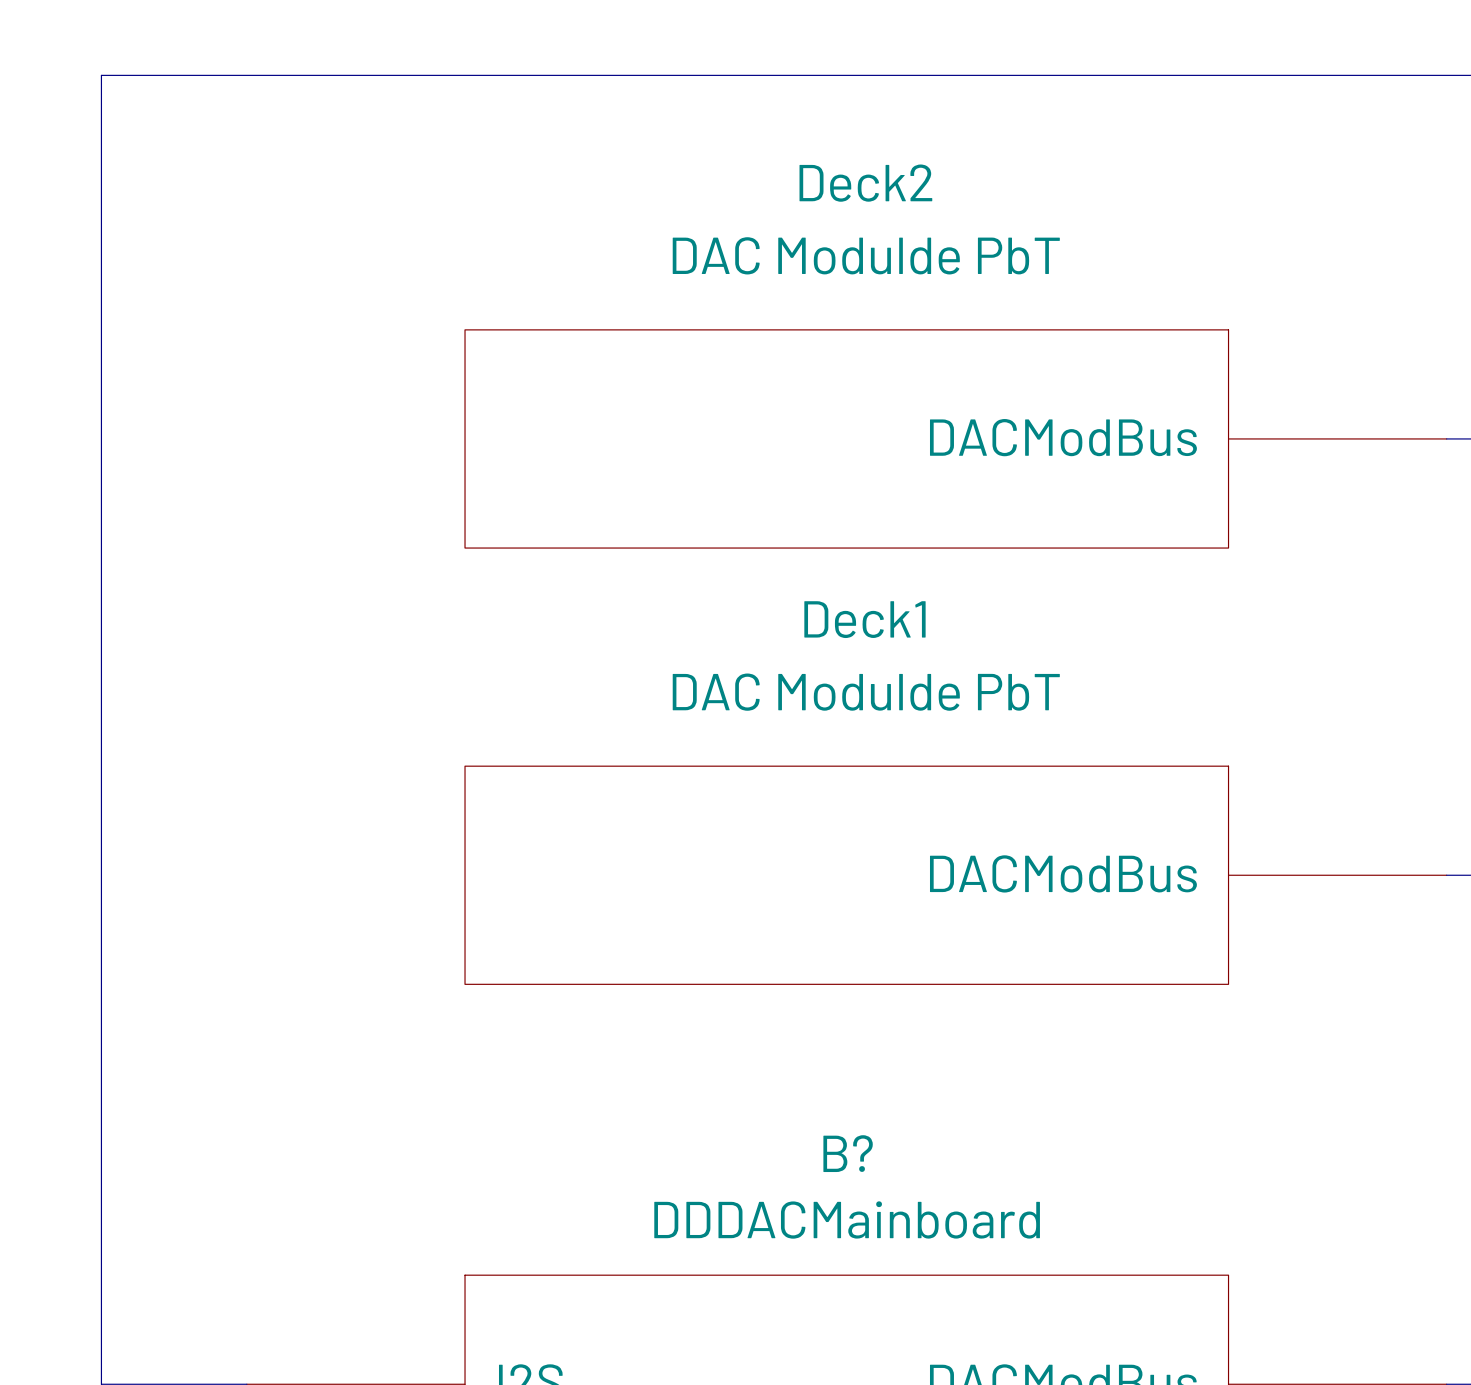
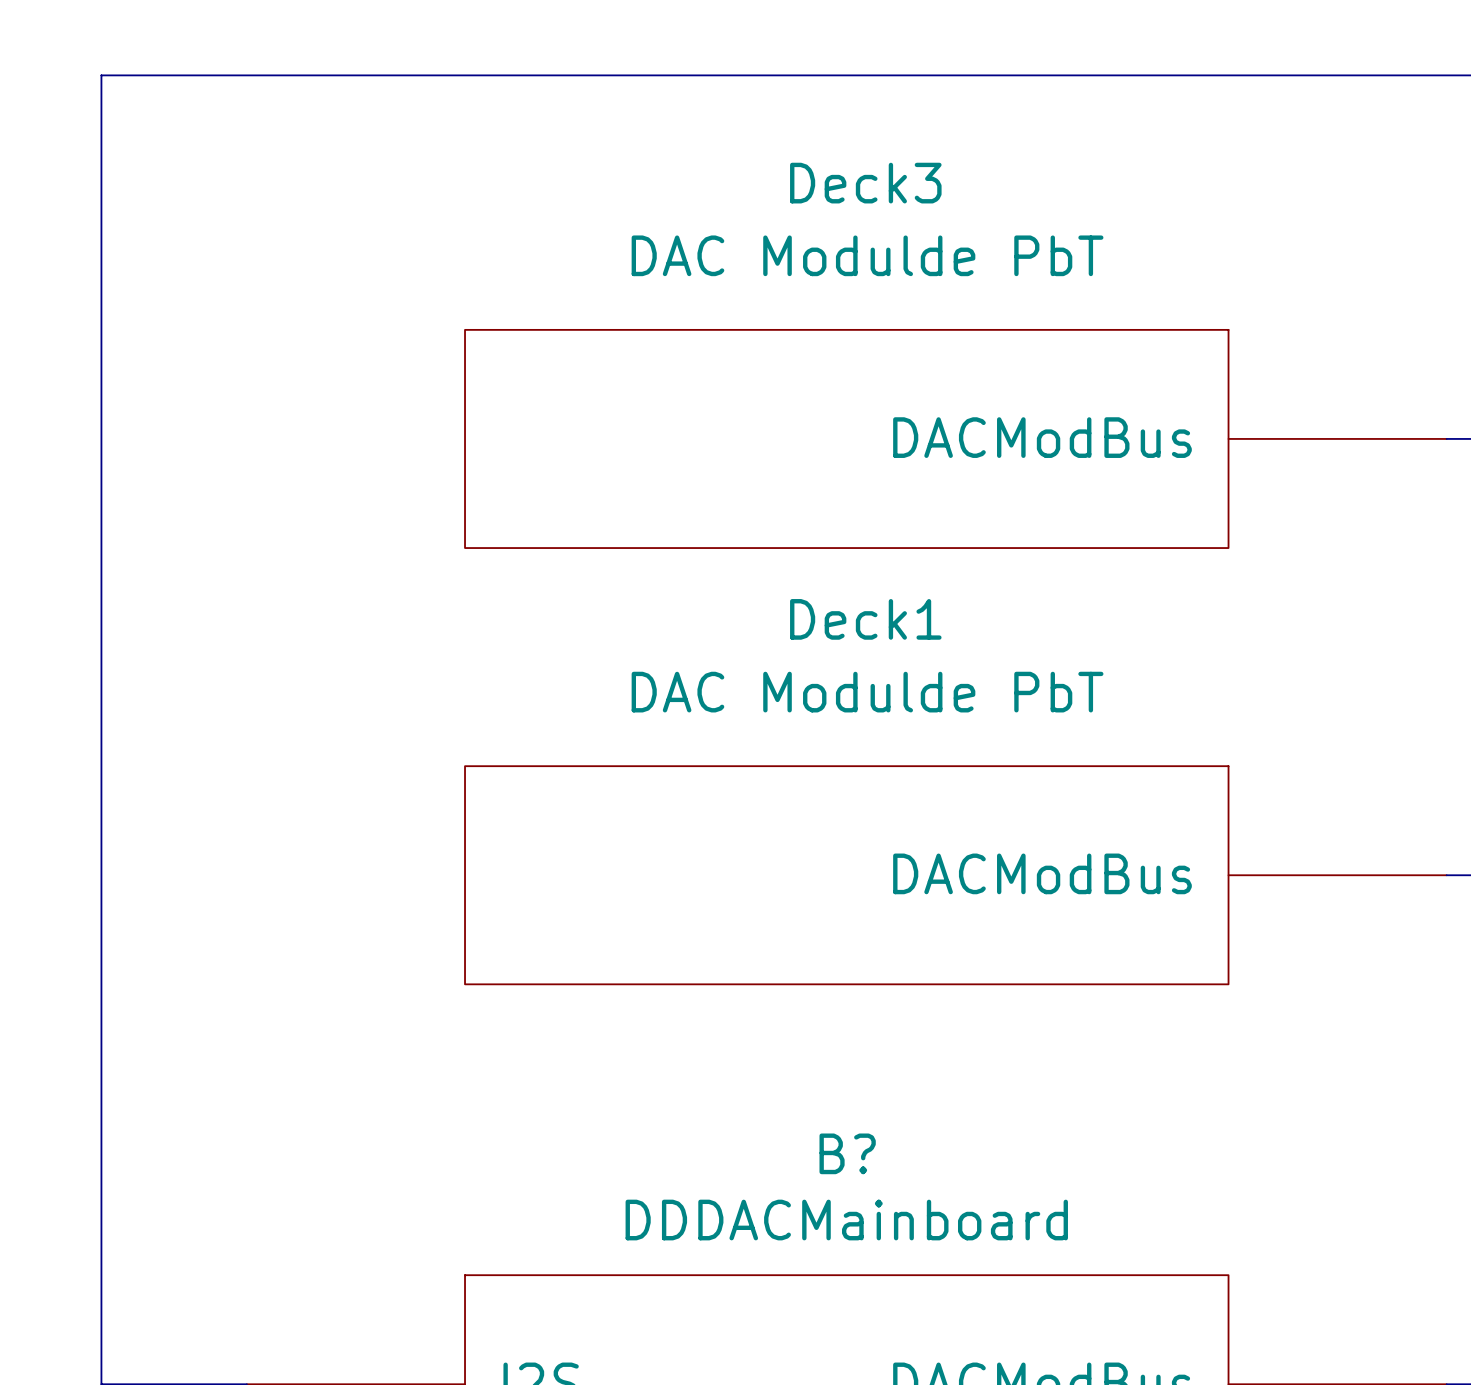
Deck2 name: Deck2 (865, 183) -> Deck3 (865, 183)

